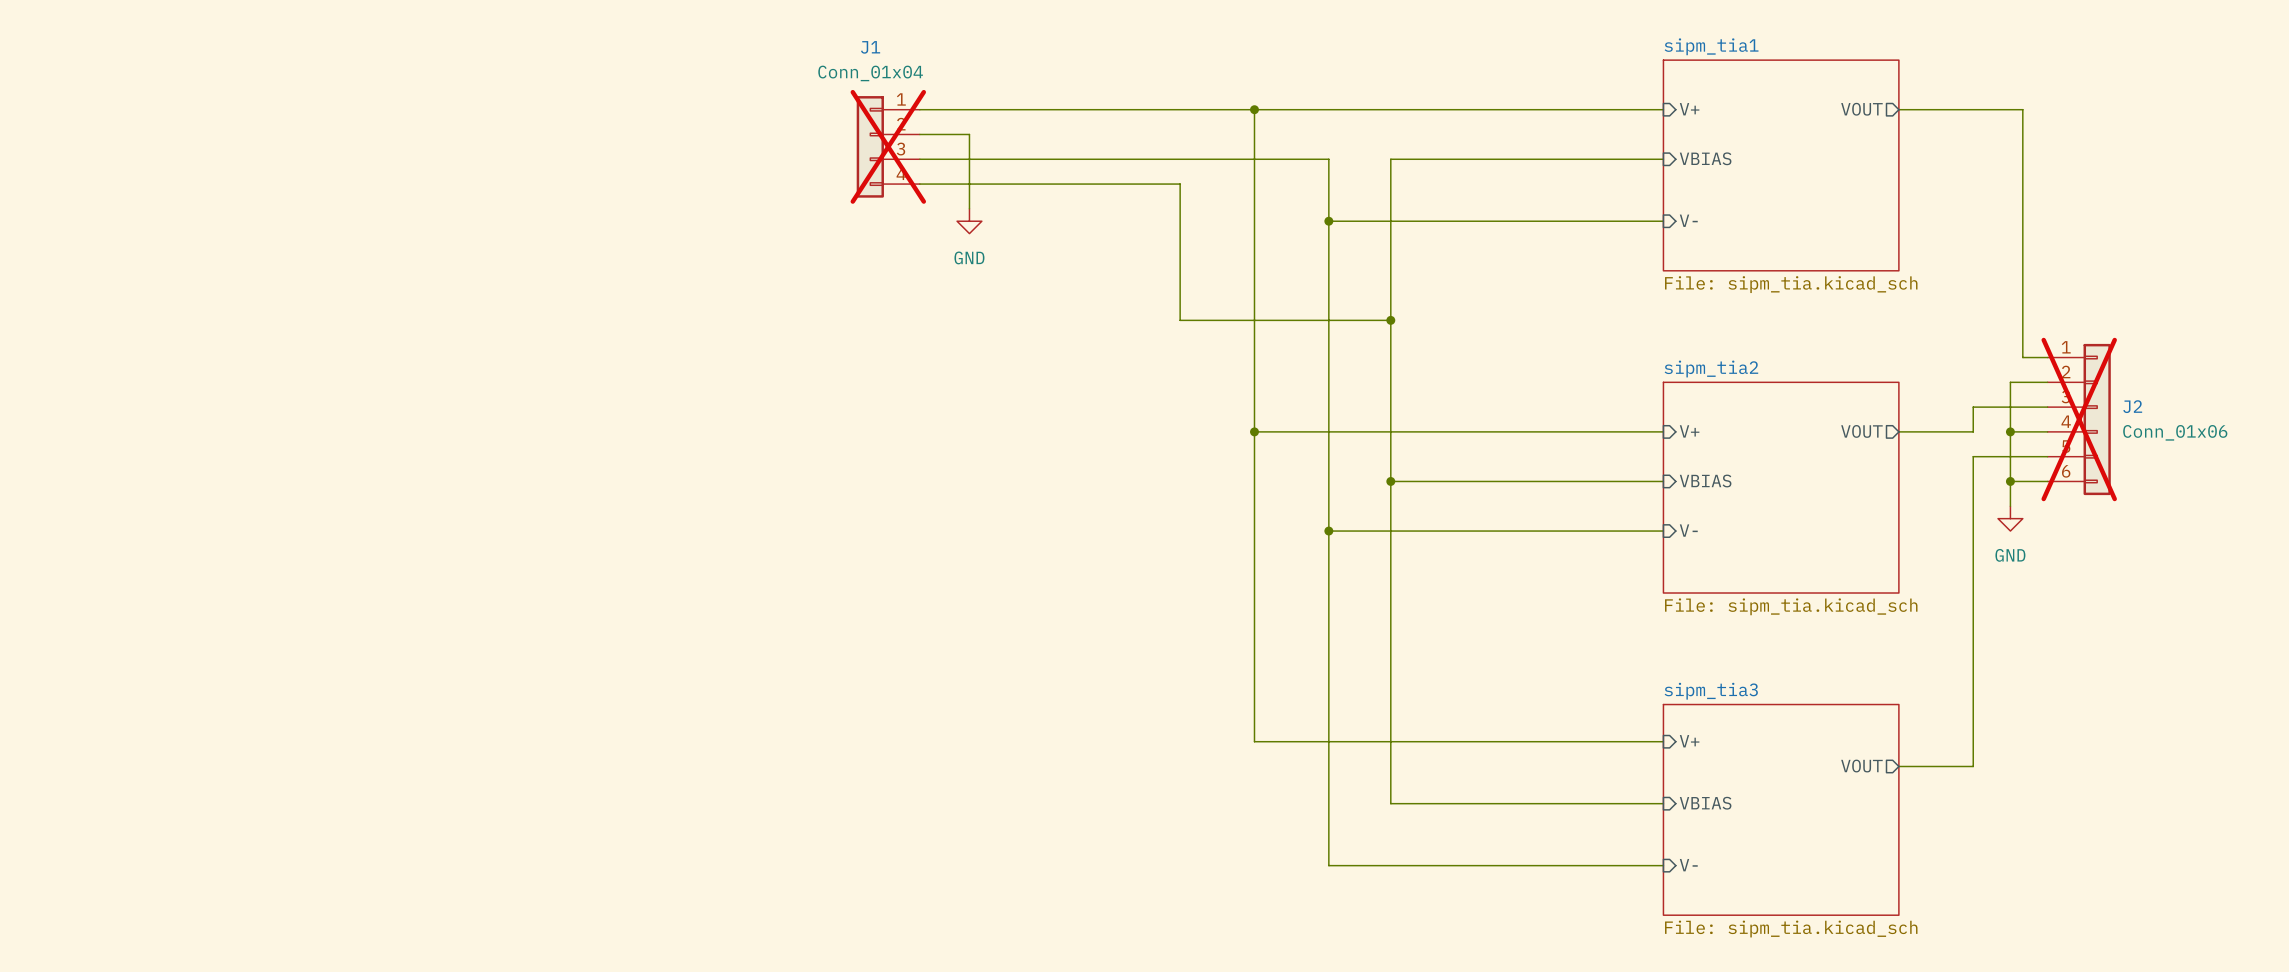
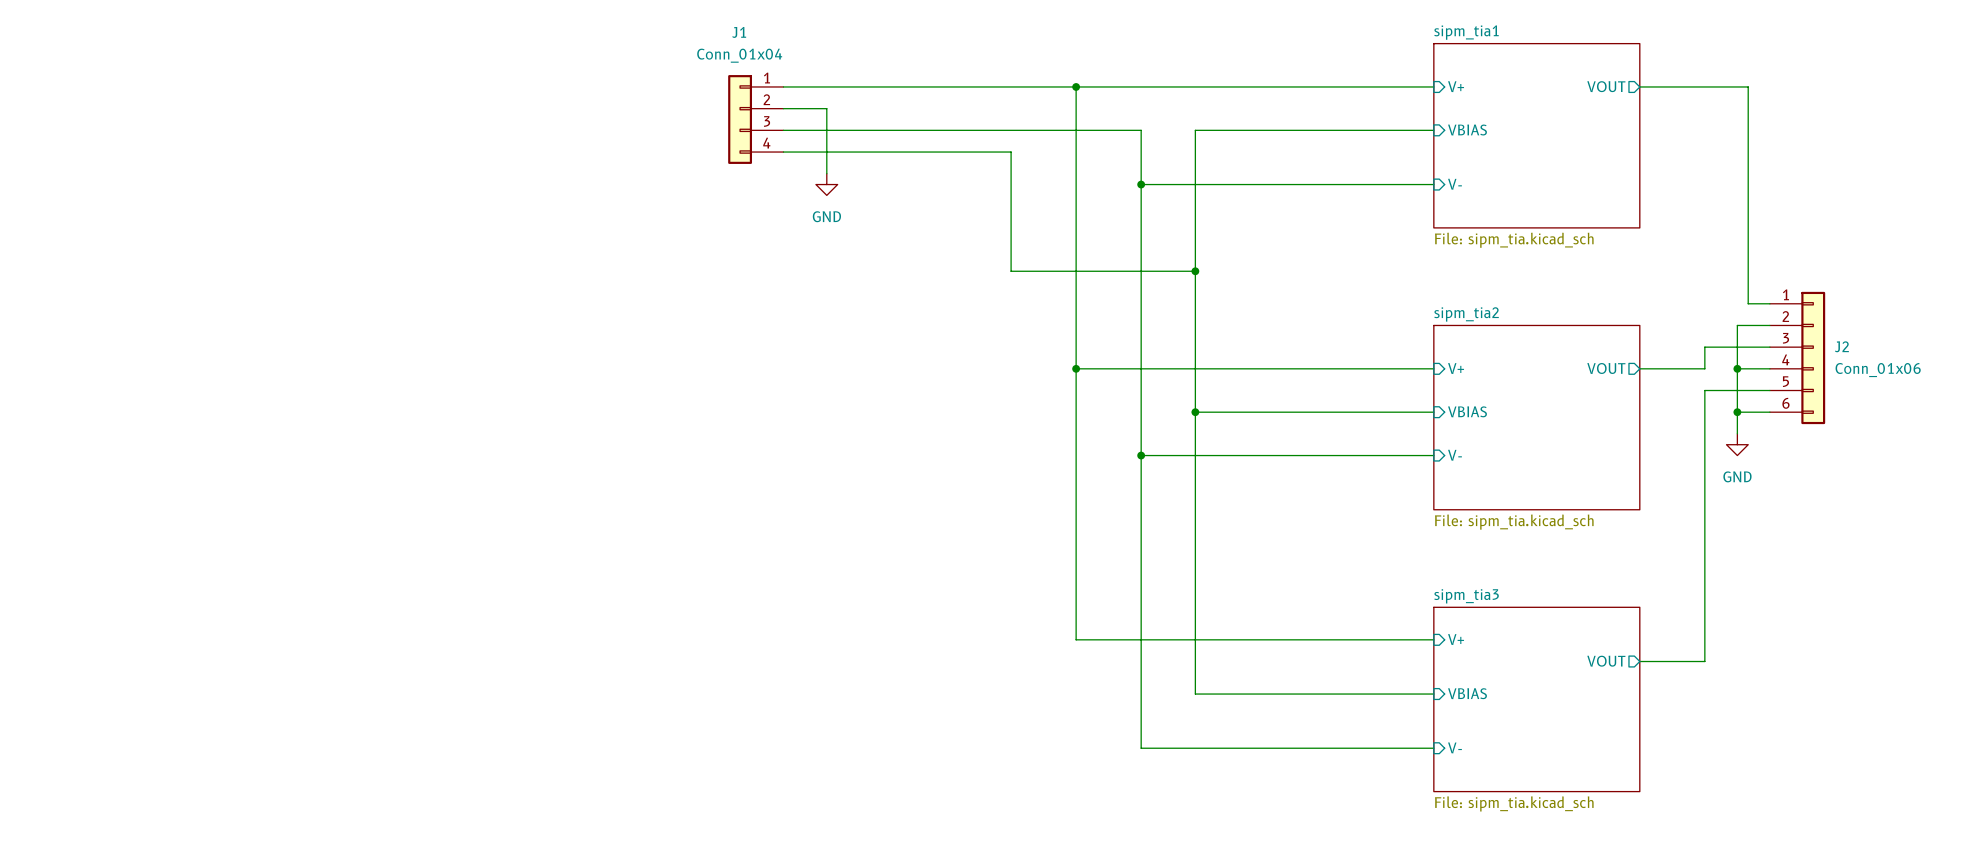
J1 do-not-place cross: (888, 146) -> none
J2 do-not-place cross: (2079, 419) -> none

